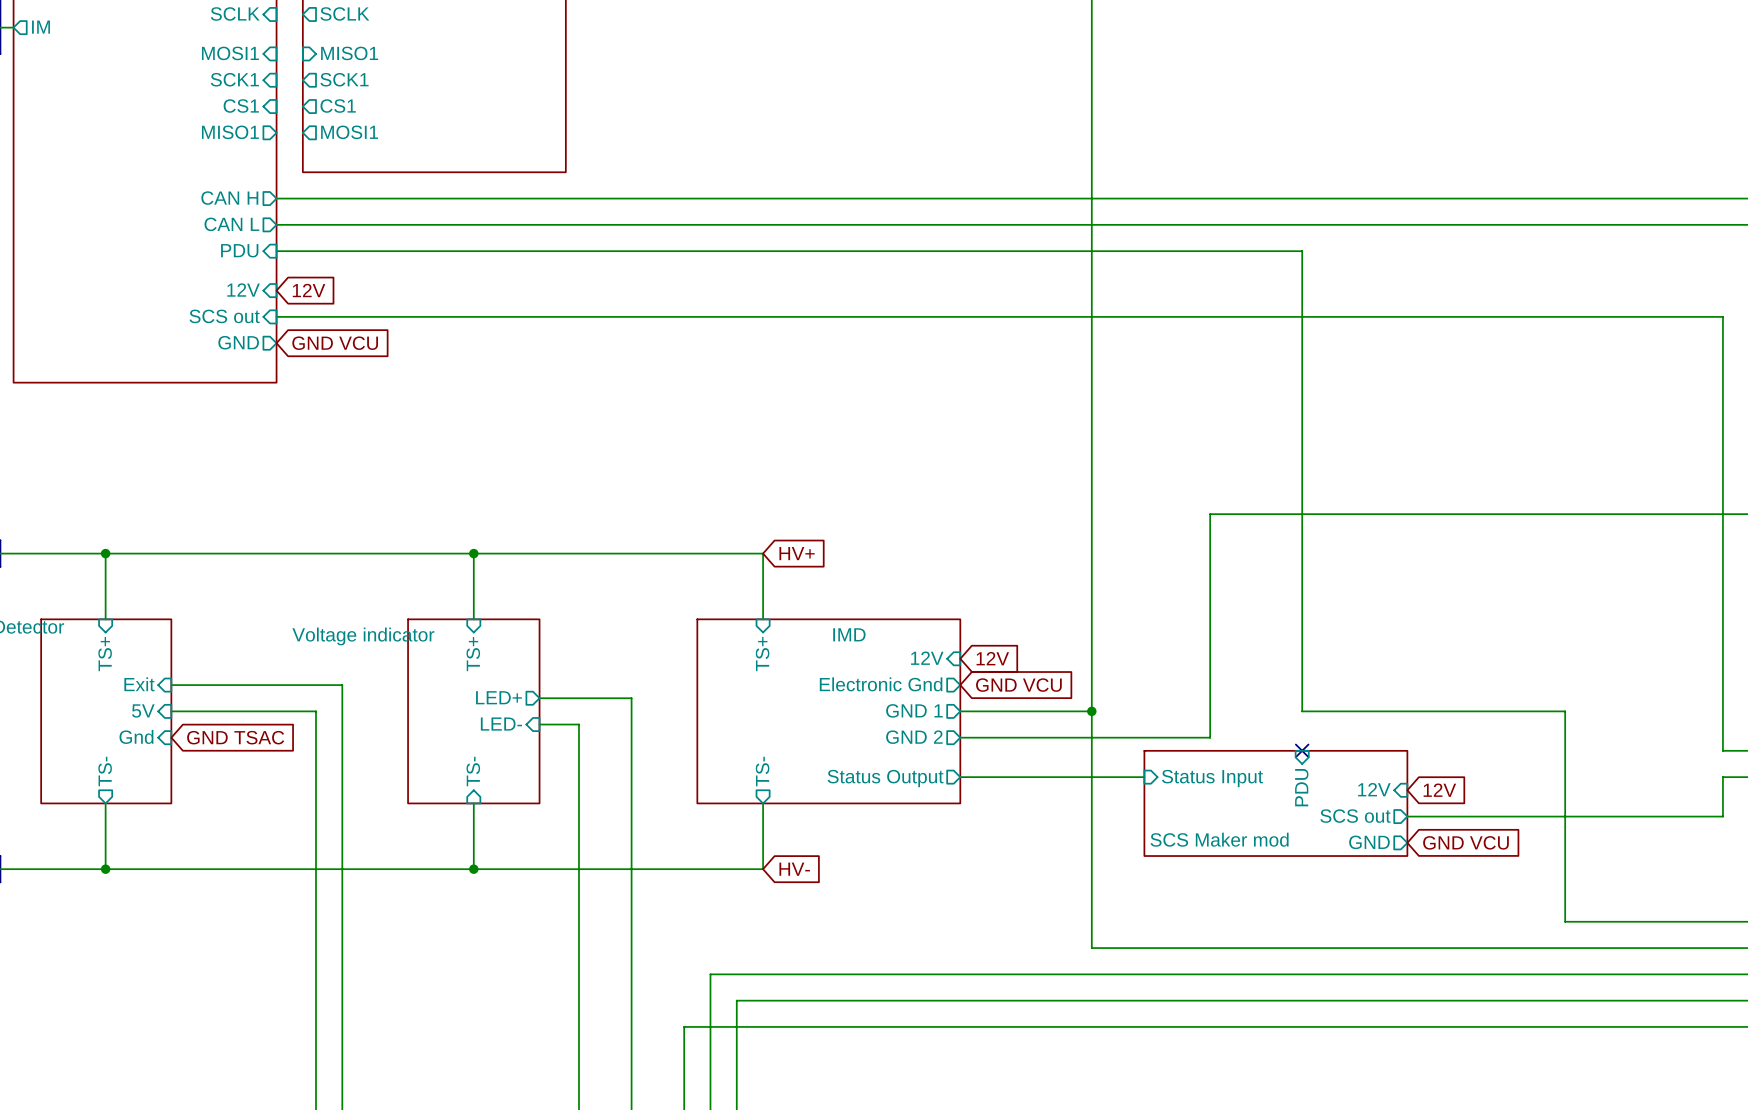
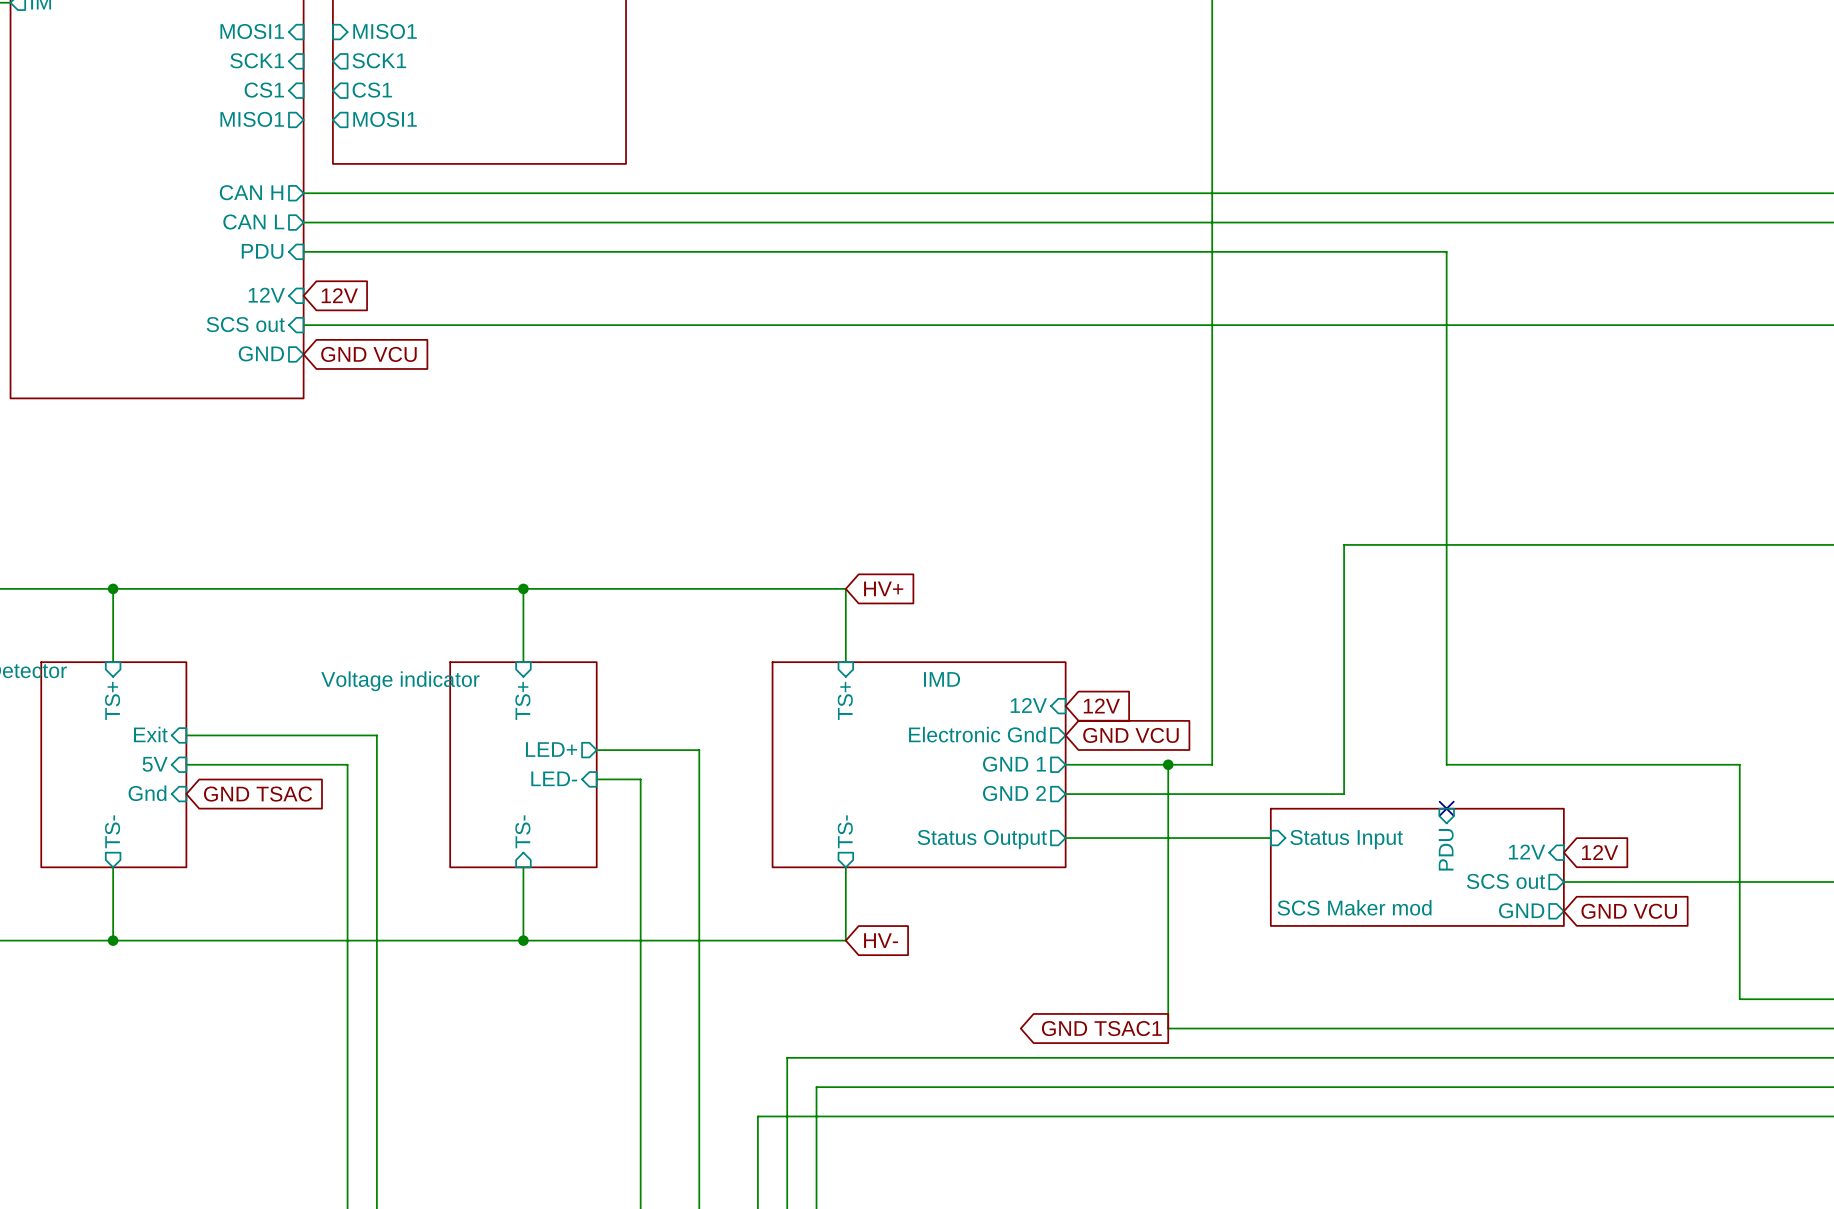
wire: (1091, 711) (1091, 948) -> (1168, 764) (1168, 1028) (1212, 1028)
junction position: (1091, 711) -> (1168, 764)
global label: none -> GND TSAC1 (1101, 1028)

